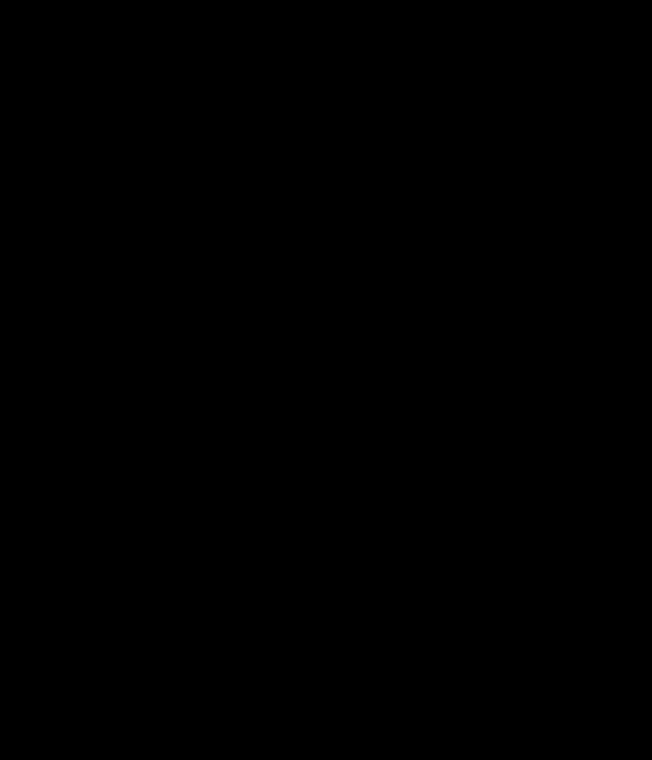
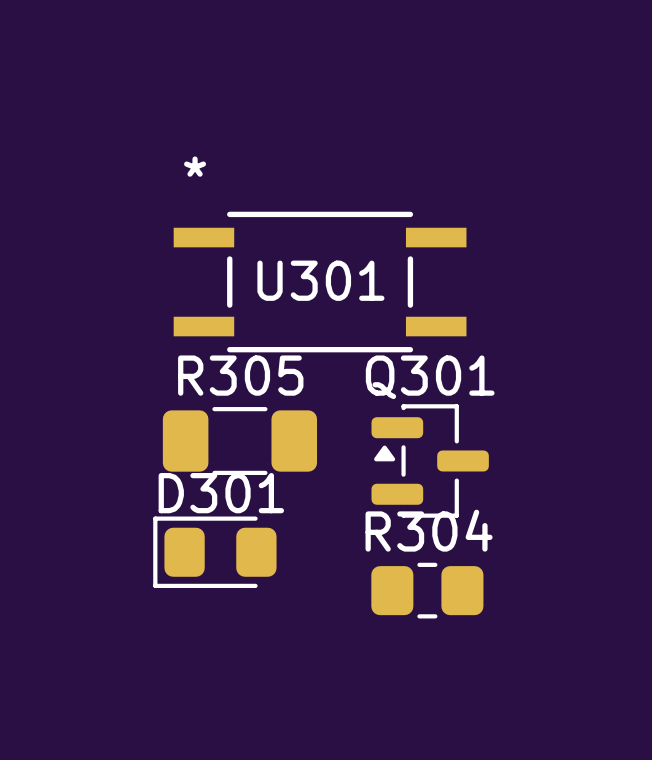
U301: none -> (320, 282)
R305: none -> (239, 441)
Q301: none -> (430, 460)
D301: none -> (214, 552)
R304: none -> (427, 590)

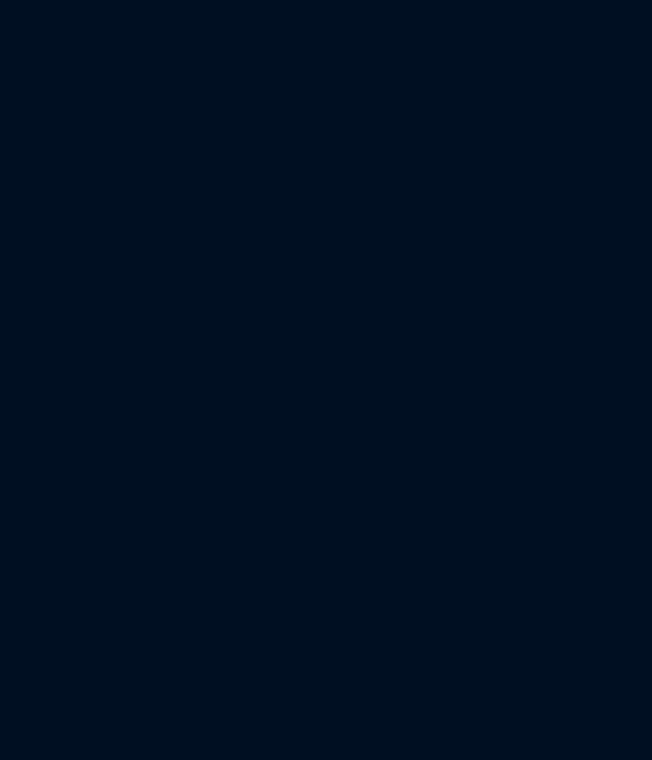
U301: (320, 282) -> none
R305: (239, 441) -> none
Q301: (430, 460) -> none
D301: (214, 552) -> none
R304: (427, 590) -> none

